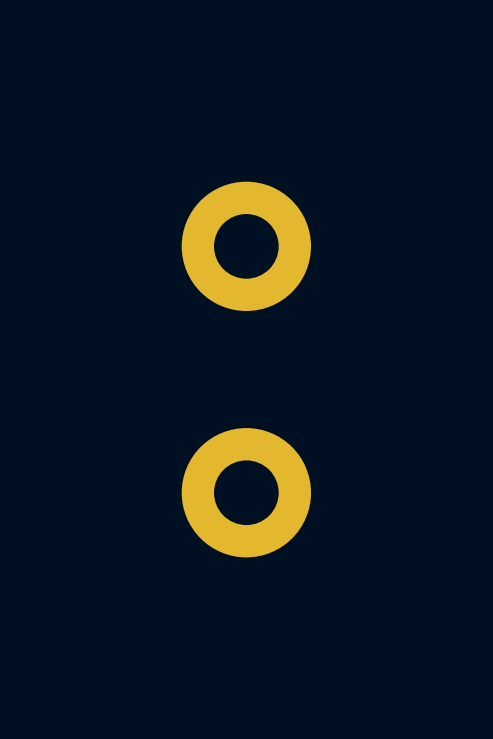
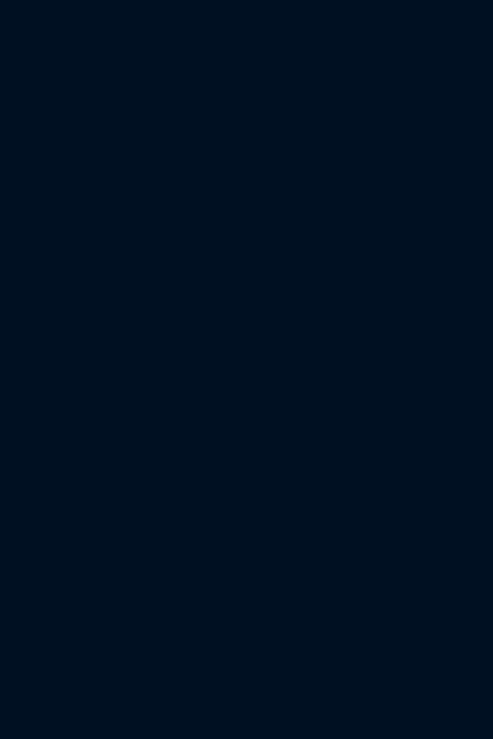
part: (246, 369) -> none

